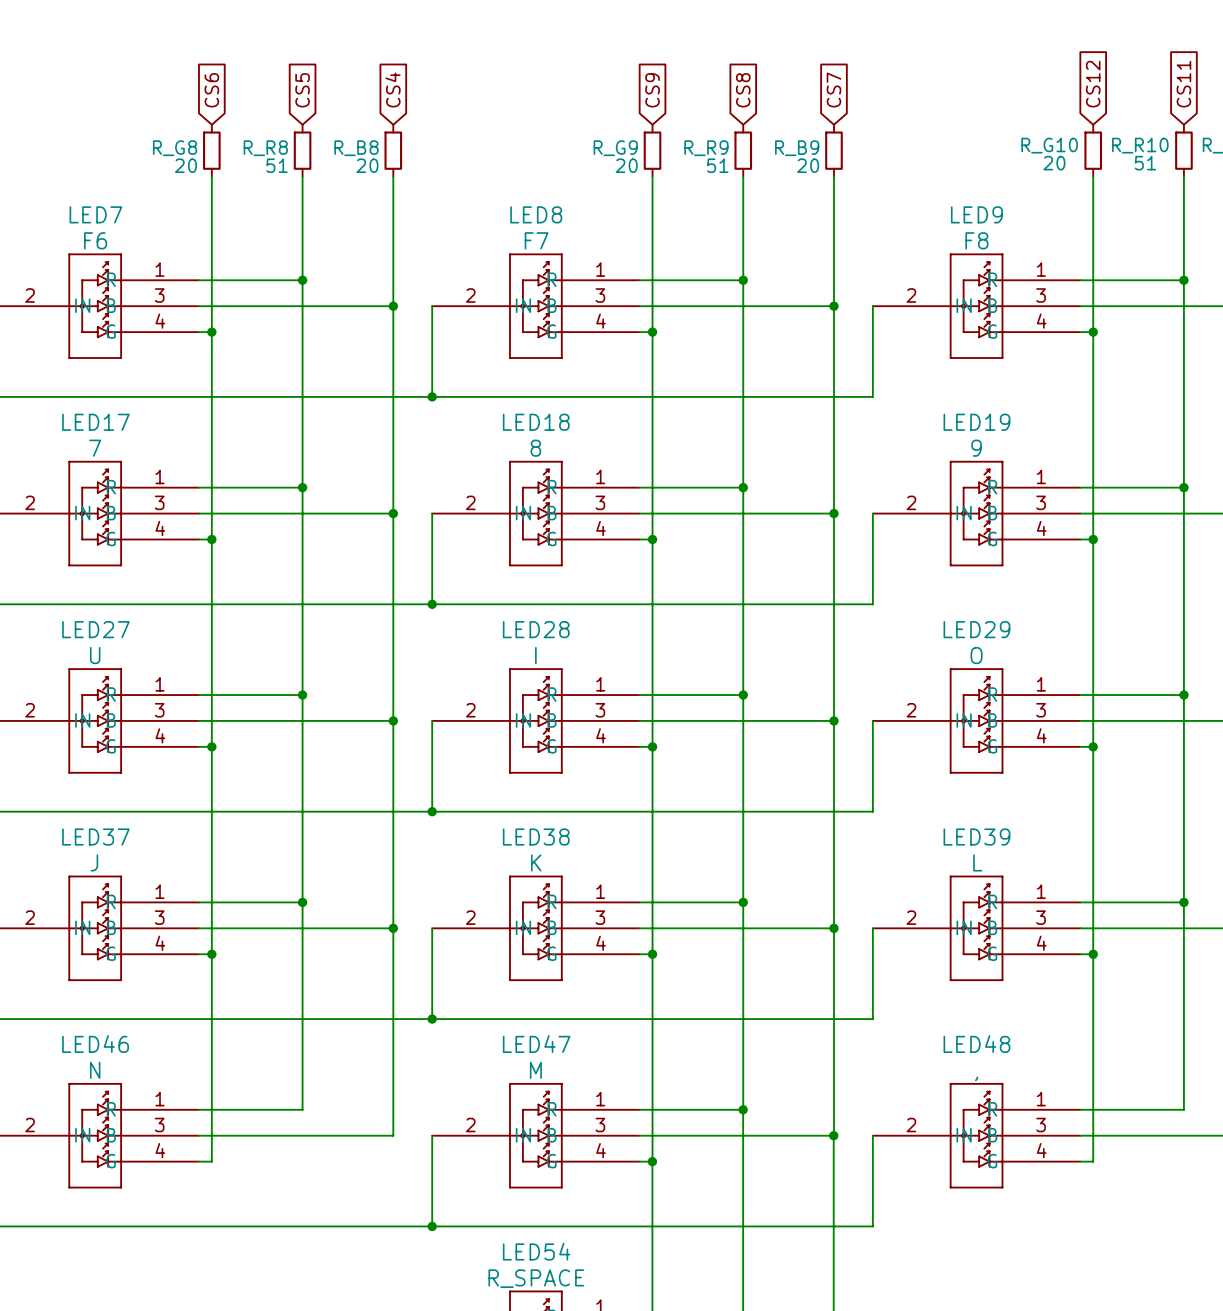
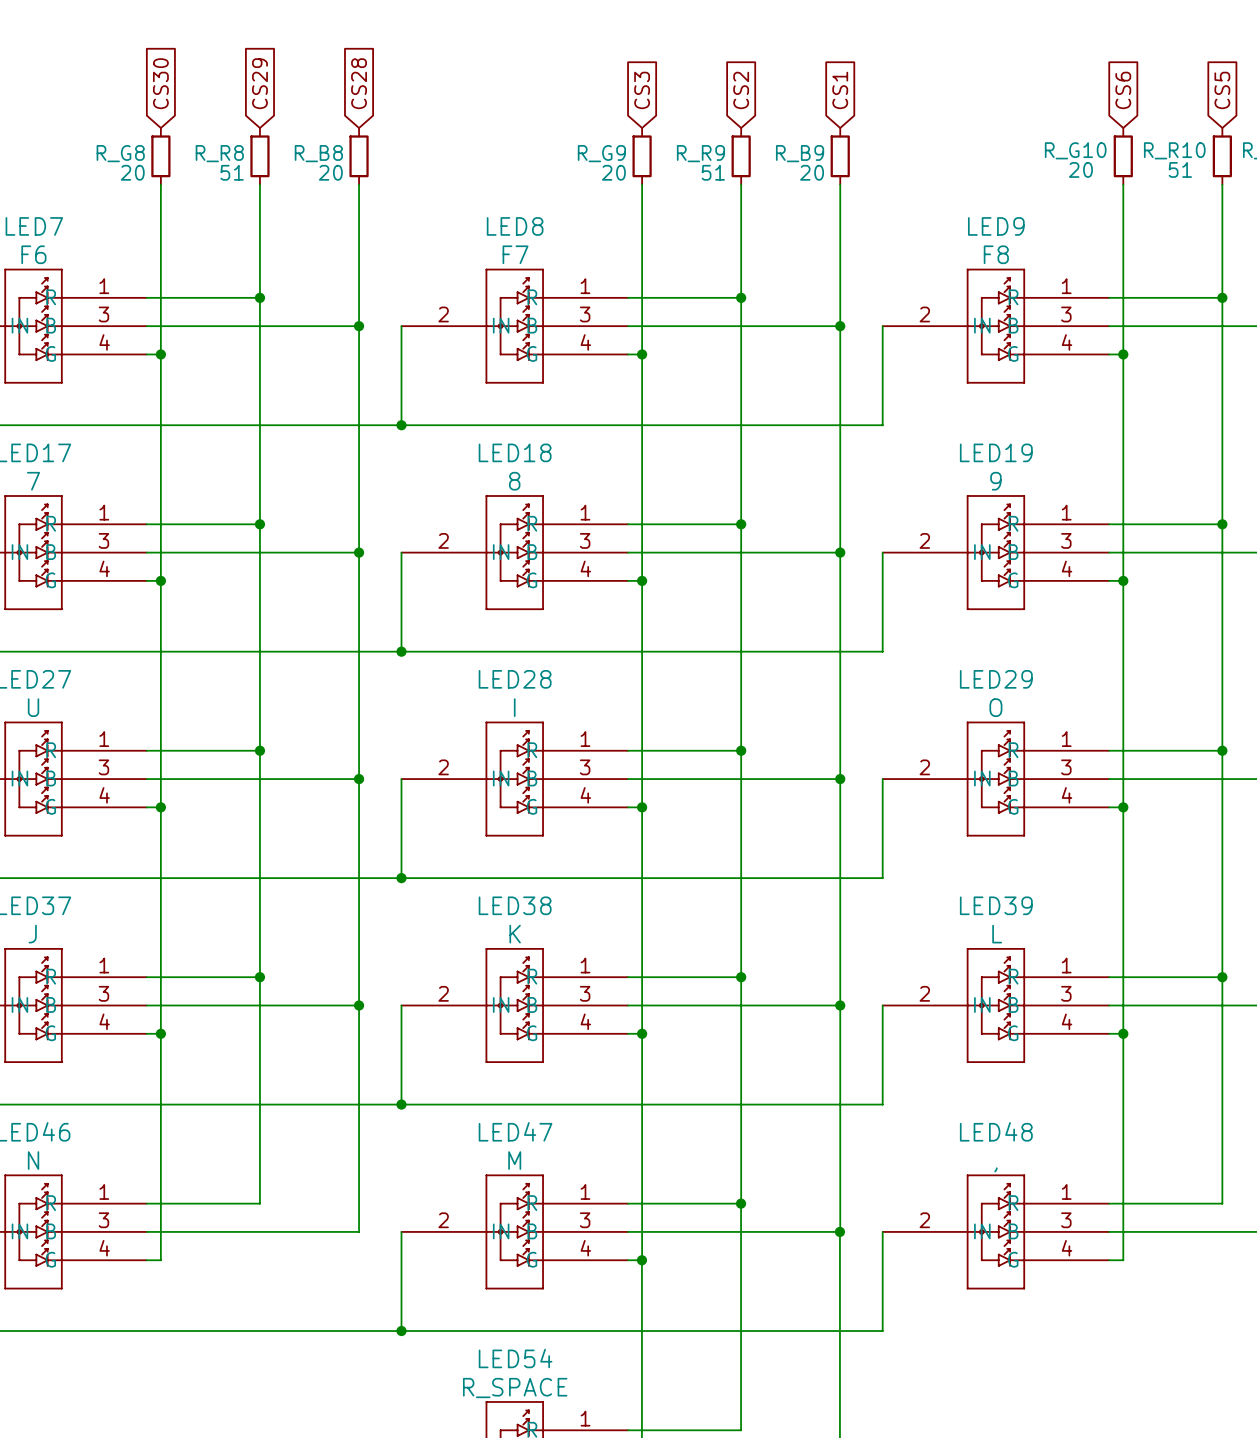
global label: CS12 (1093, 84) -> CS6 (1123, 90)
global label: CS11 (1183, 84) -> CS5 (1222, 90)
global label: CS4 (392, 89) -> CS28 (359, 83)
global label: CS7 (833, 89) -> CS1 (840, 90)
global label: CS6 (211, 90) -> CS30 (160, 83)
global label: CS5 (302, 90) -> CS29 (259, 83)
global label: CS9 (652, 90) -> CS3 (642, 90)
global label: CS8 (743, 90) -> CS2 (741, 90)

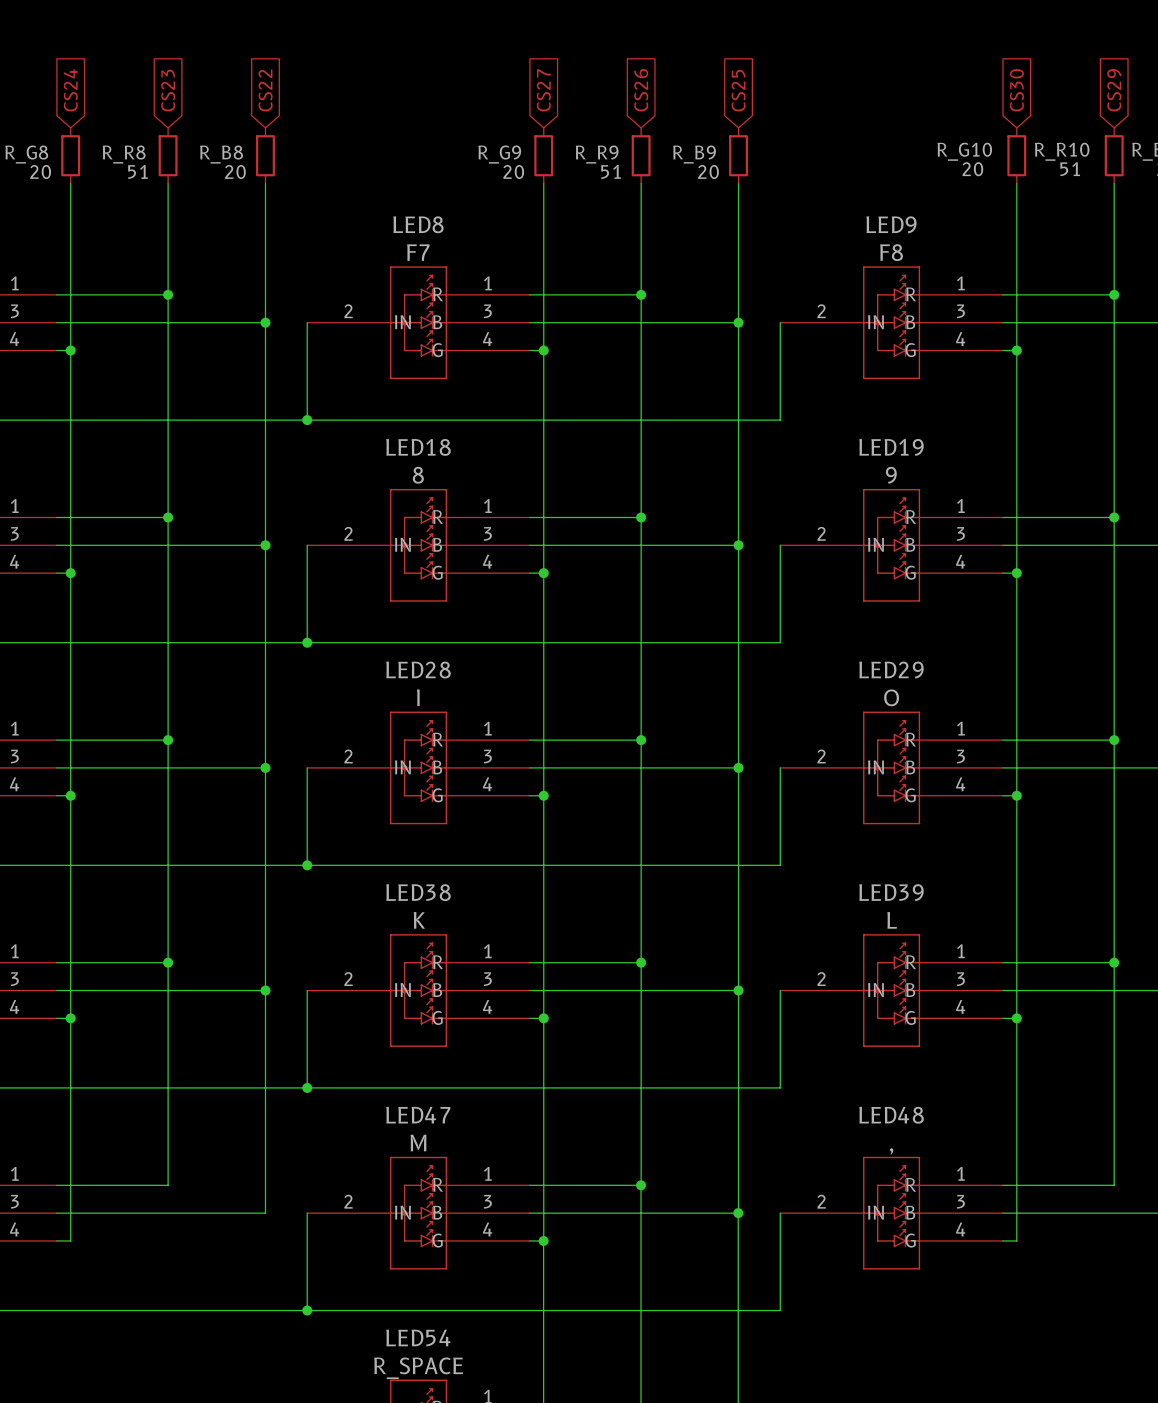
global label: CS30 (160, 83) -> CS24 (70, 90)
global label: CS29 (259, 83) -> CS23 (168, 90)
global label: CS28 (359, 83) -> CS22 (265, 90)
global label: CS3 (642, 90) -> CS27 (543, 90)
global label: CS2 (741, 90) -> CS26 (641, 90)
global label: CS1 (840, 90) -> CS25 (738, 90)
global label: CS6 (1123, 90) -> CS30 (1016, 90)
global label: CS5 (1222, 90) -> CS29 (1114, 90)

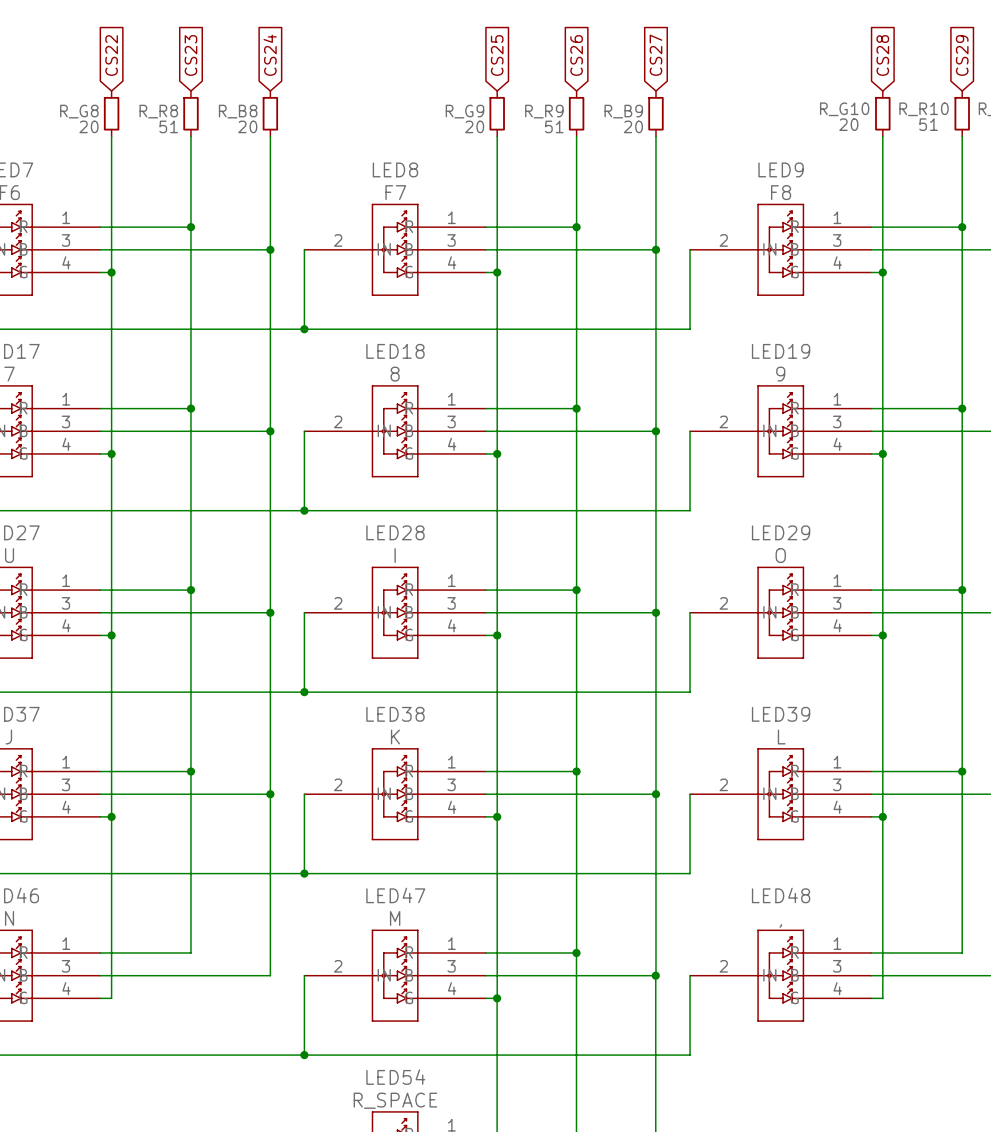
global label: CS24 (70, 90) -> CS22 (111, 55)
global label: CS22 (265, 90) -> CS24 (270, 55)
global label: CS27 (543, 90) -> CS25 (497, 55)
global label: CS25 (738, 90) -> CS27 (655, 55)
global label: CS30 (1016, 90) -> CS28 (882, 55)

